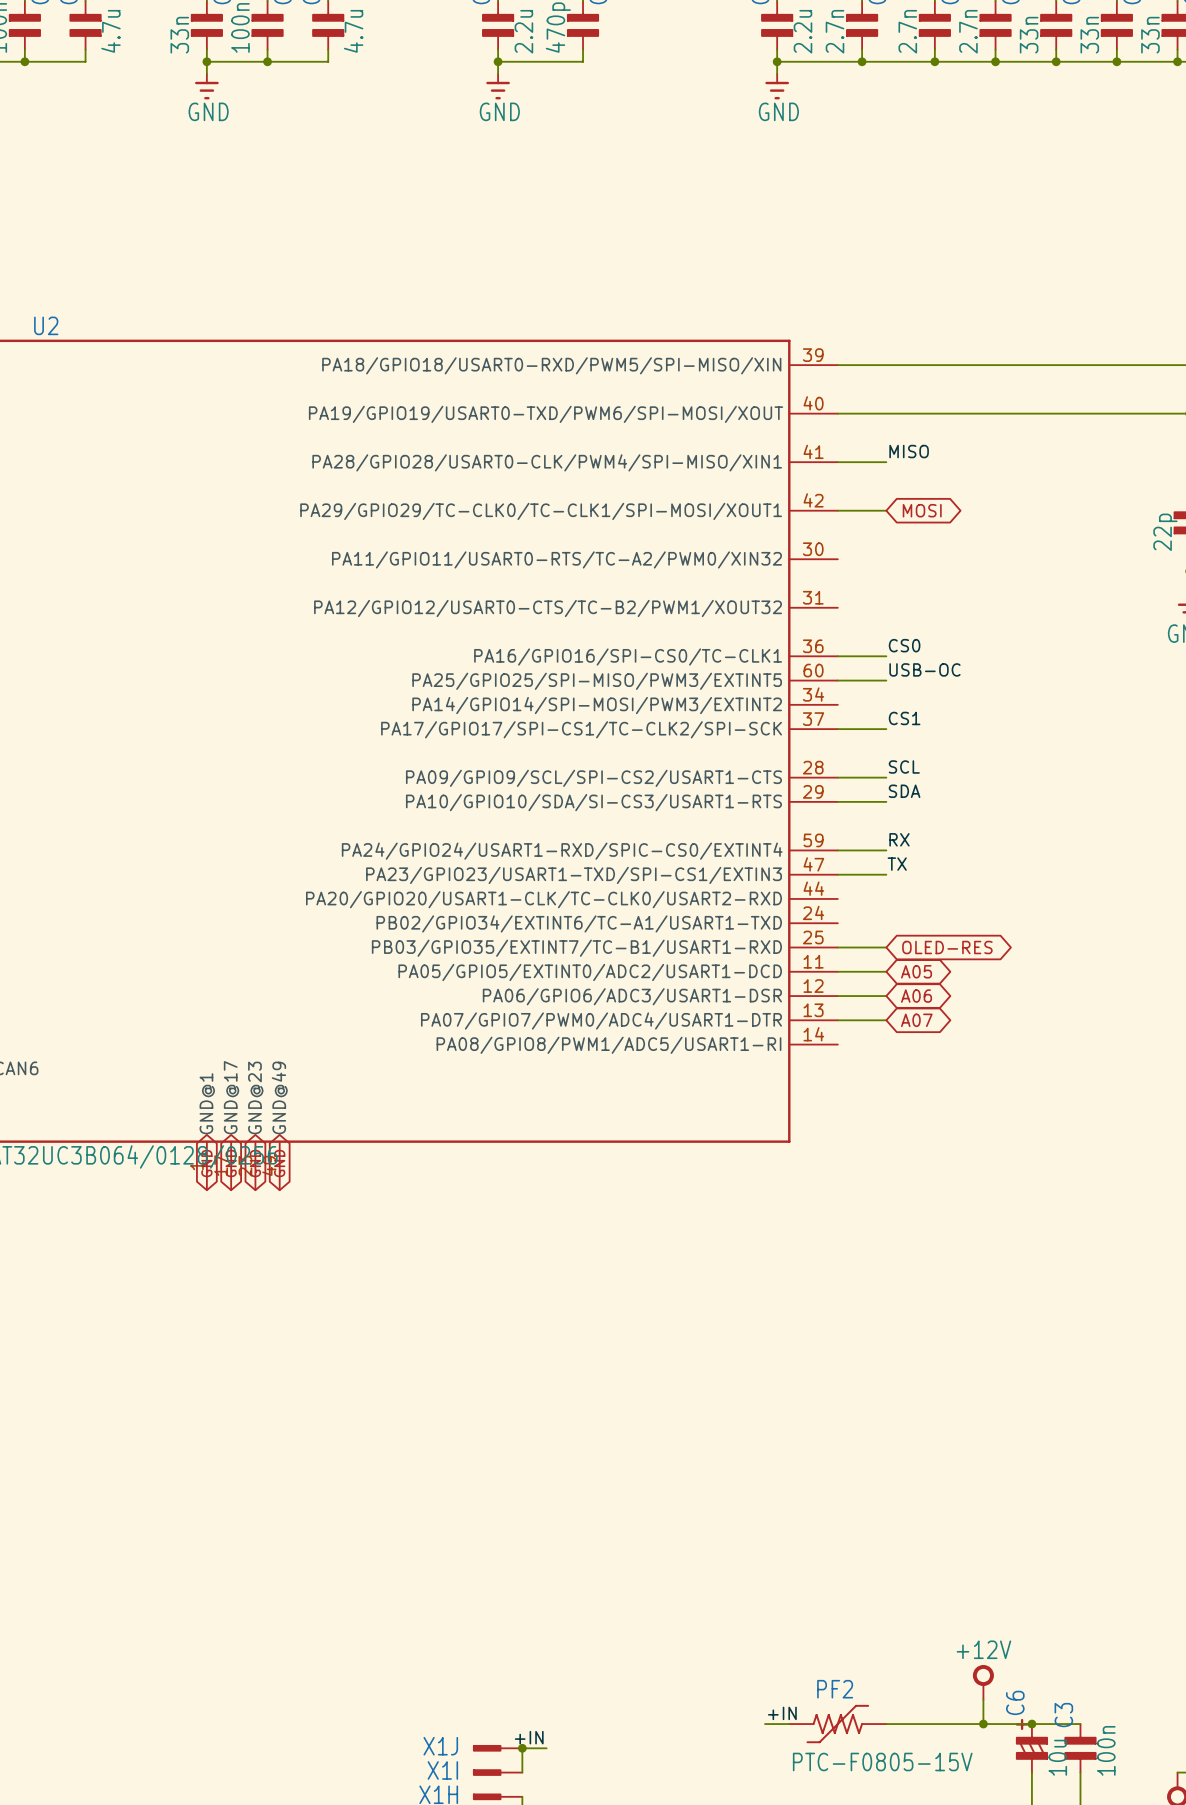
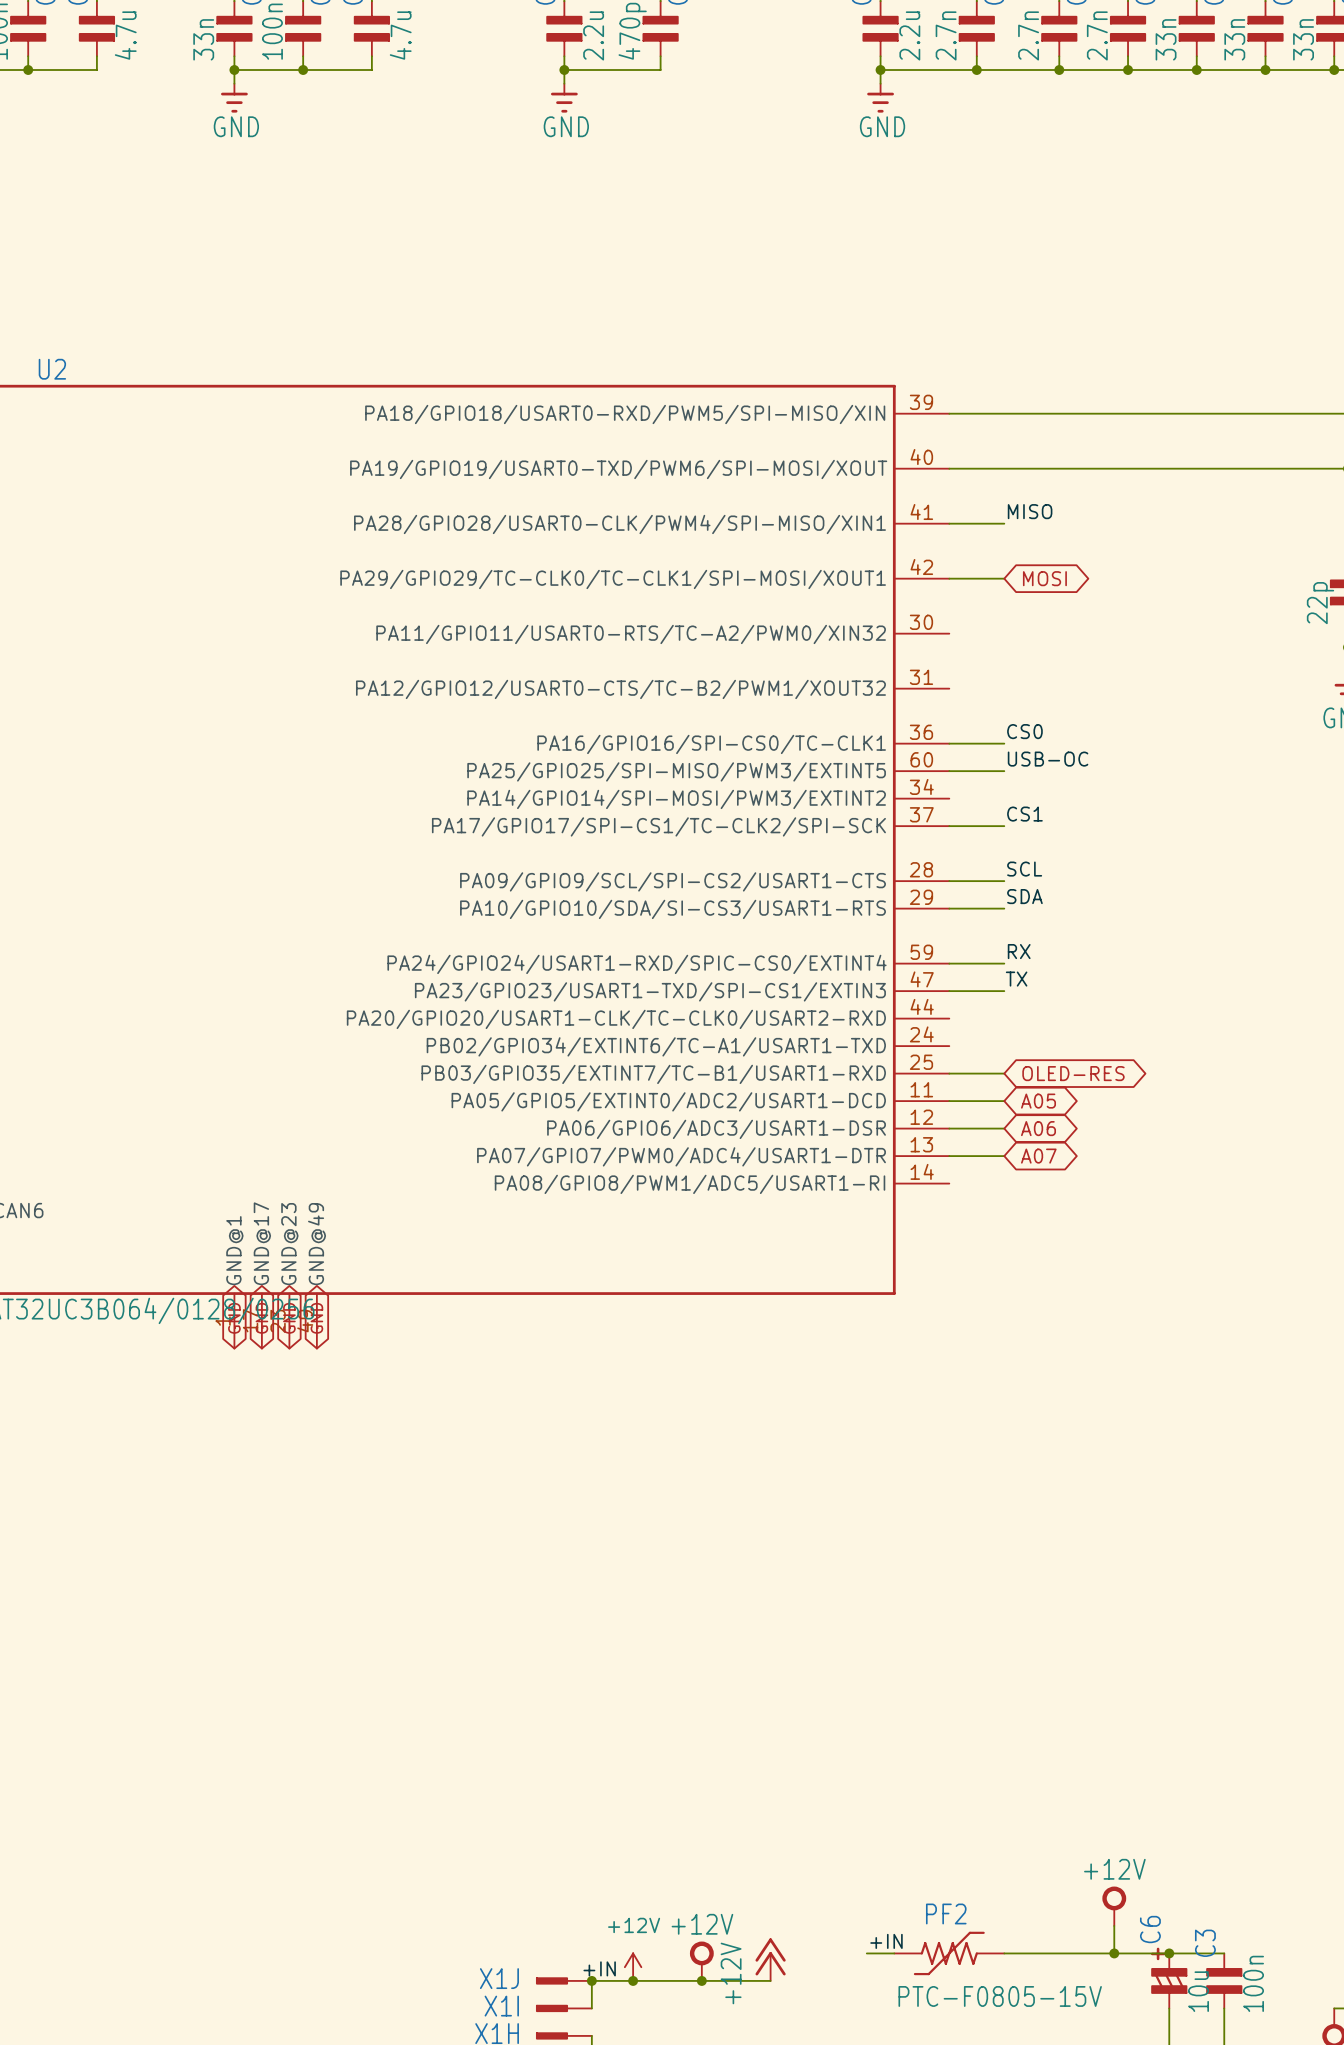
power symbol: none -> +12V (770, 1959)
power symbol: none -> +12V (701, 1961)
power symbol: none -> +12V (633, 1967)
wire: none -> (619, 1980) (770, 1980)
junction: none -> (633, 1980)
junction: none -> (701, 1980)

